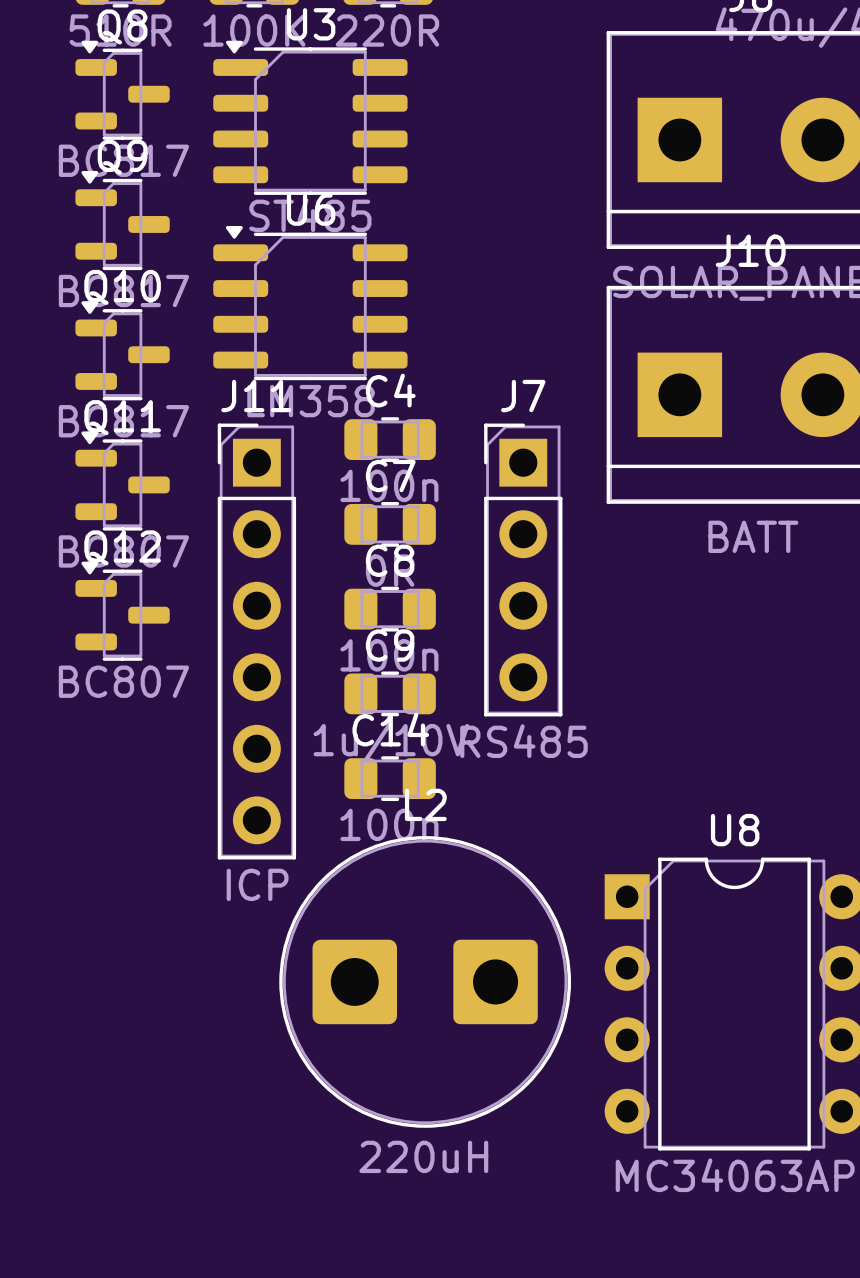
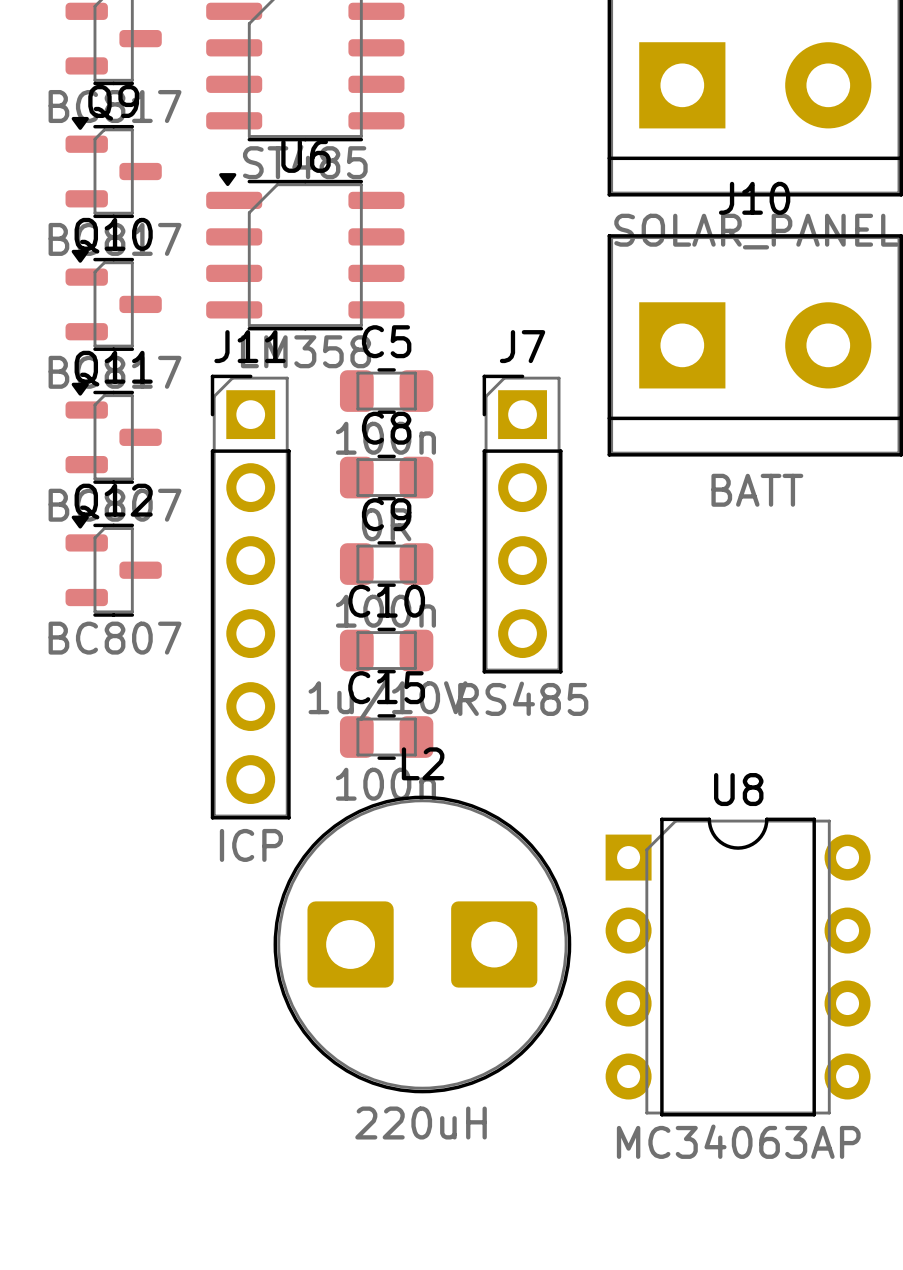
C4 name: C4 (390, 390) -> C5 (386, 341)
C7 name: C7 (390, 476) -> C8 (386, 428)
C8 name: C8 (390, 560) -> C9 (386, 514)
C9 name: C9 (390, 645) -> C10 (386, 601)
C14 name: C14 (390, 729) -> C15 (386, 687)

